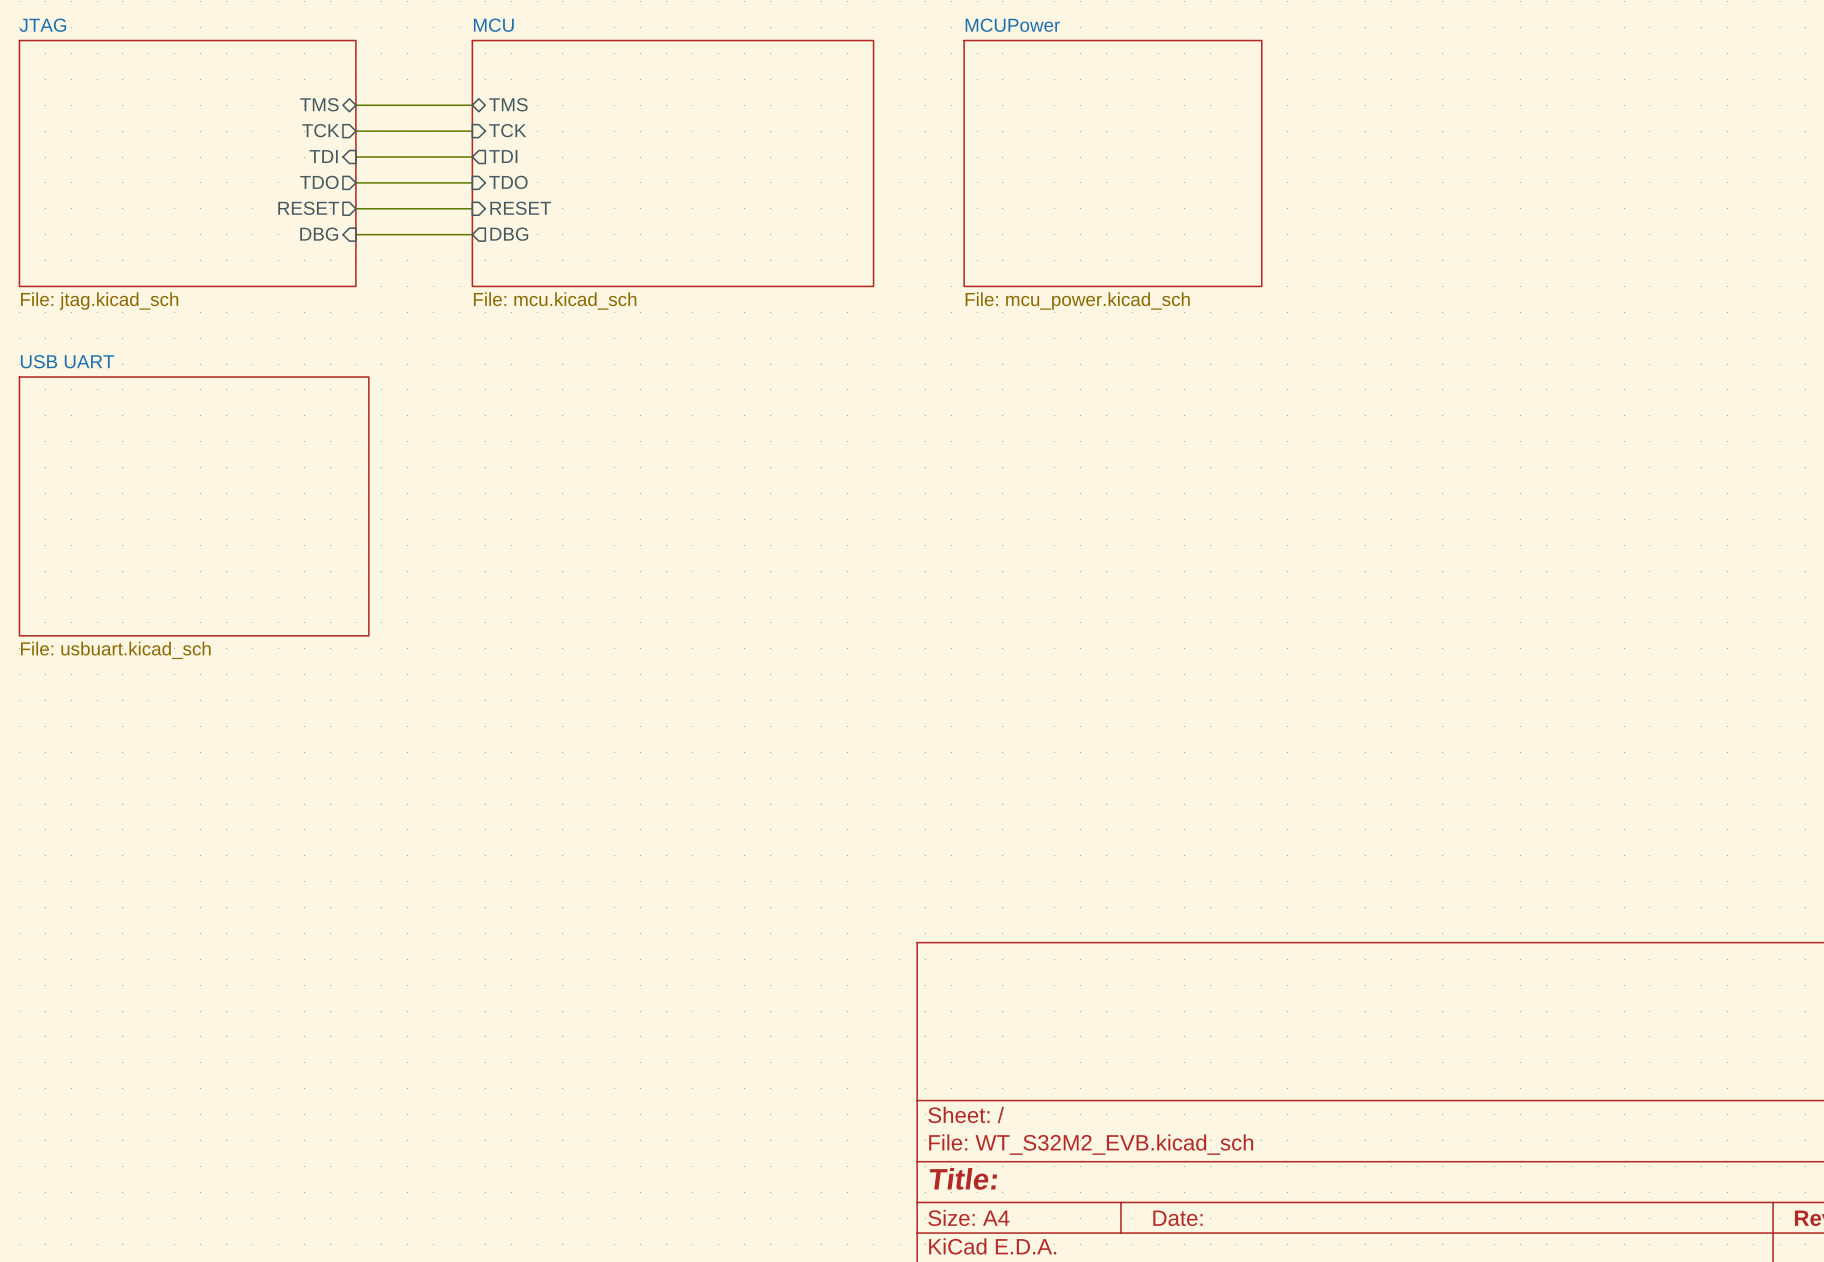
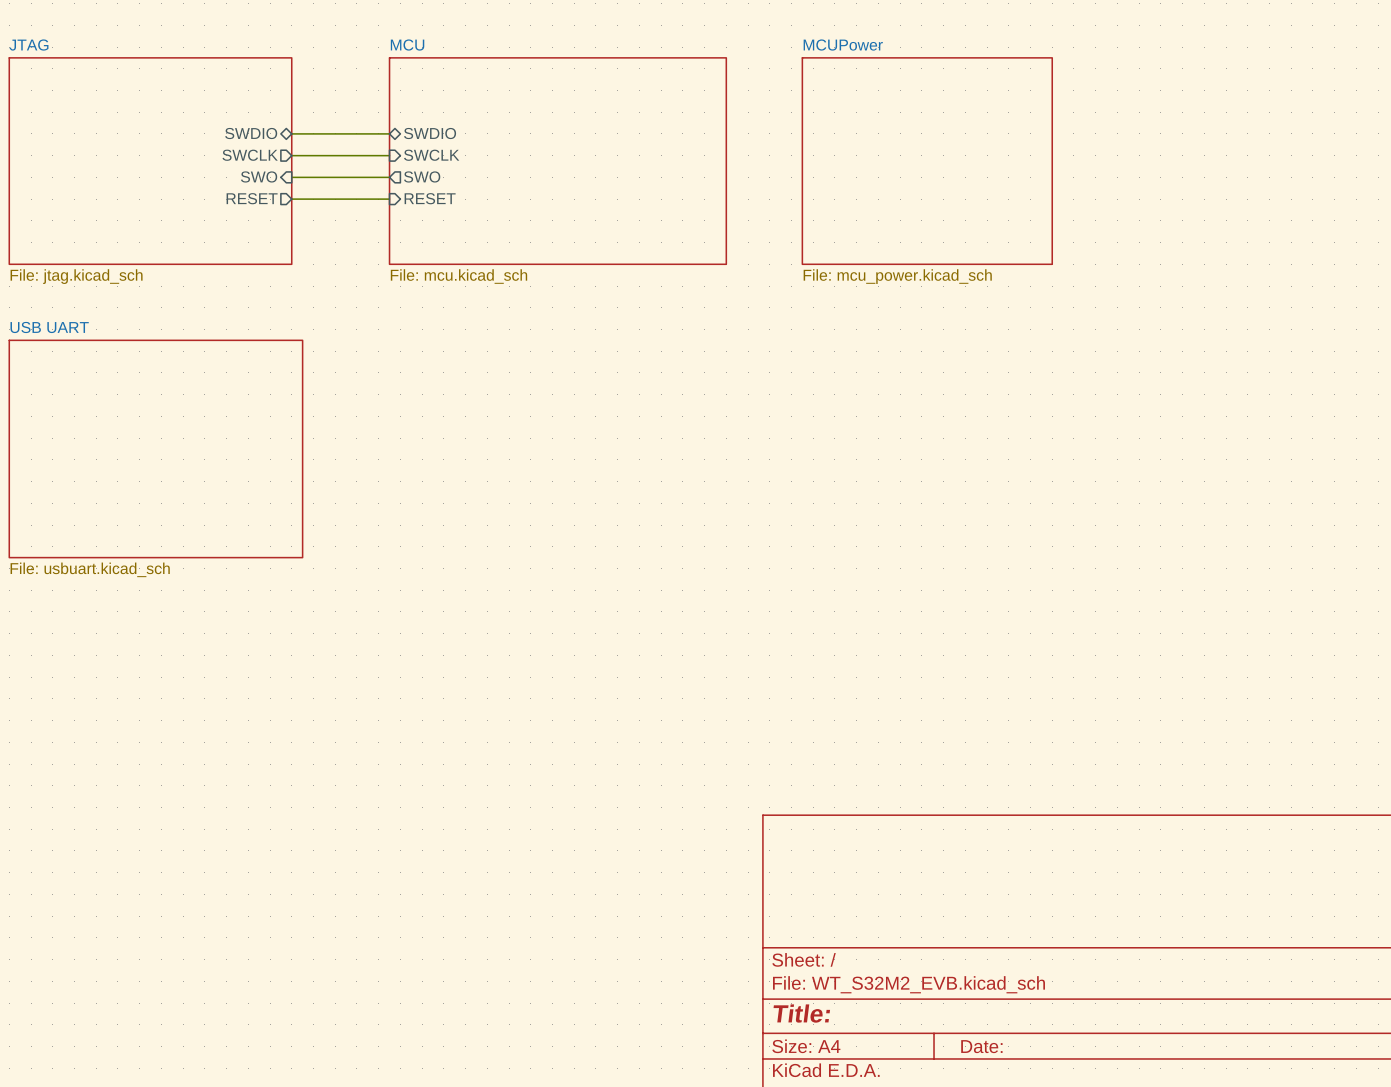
sheet pin: TMS (319, 104) -> none
sheet pin: TMS (508, 104) -> none
wire: (355, 105) (472, 105) -> none
sheet pin shape: output (320, 130) -> bidirectional (251, 133)
sheet pin: TCK (320, 130) -> SWDIO (251, 133)
sheet pin shape: input (507, 130) -> bidirectional (430, 133)
sheet pin: TCK (507, 130) -> SWDIO (430, 133)
sheet pin shape: input (323, 156) -> output (250, 155)
sheet pin: TDI (323, 156) -> SWCLK (250, 155)
sheet pin shape: output (503, 156) -> input (431, 155)
sheet pin: TDI (503, 156) -> SWCLK (431, 155)
sheet pin shape: output (319, 182) -> input (259, 176)
sheet pin: TDO (319, 182) -> SWO (259, 176)
sheet pin shape: input (508, 182) -> output (422, 176)
sheet pin: TDO (508, 182) -> SWO (422, 176)
sheet pin: DBG (319, 234) -> none
wire: (355, 234) (472, 234) -> none
sheet pin: DBG (509, 234) -> none

